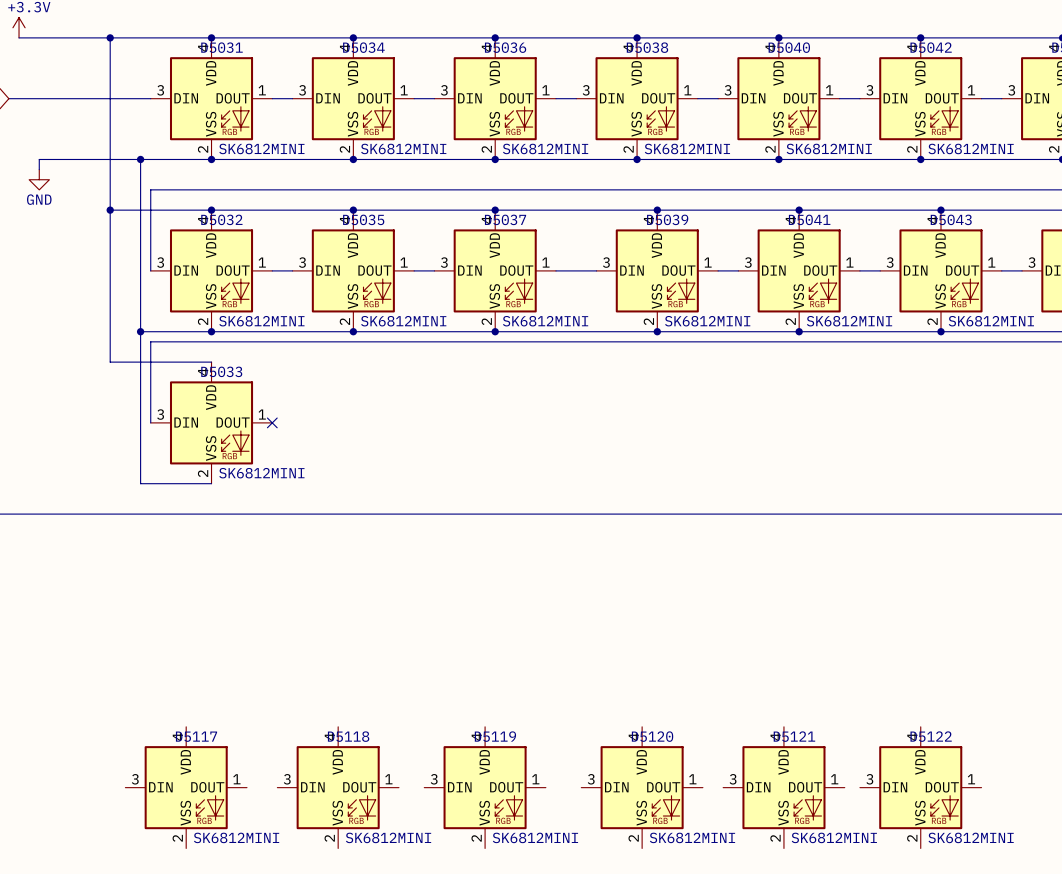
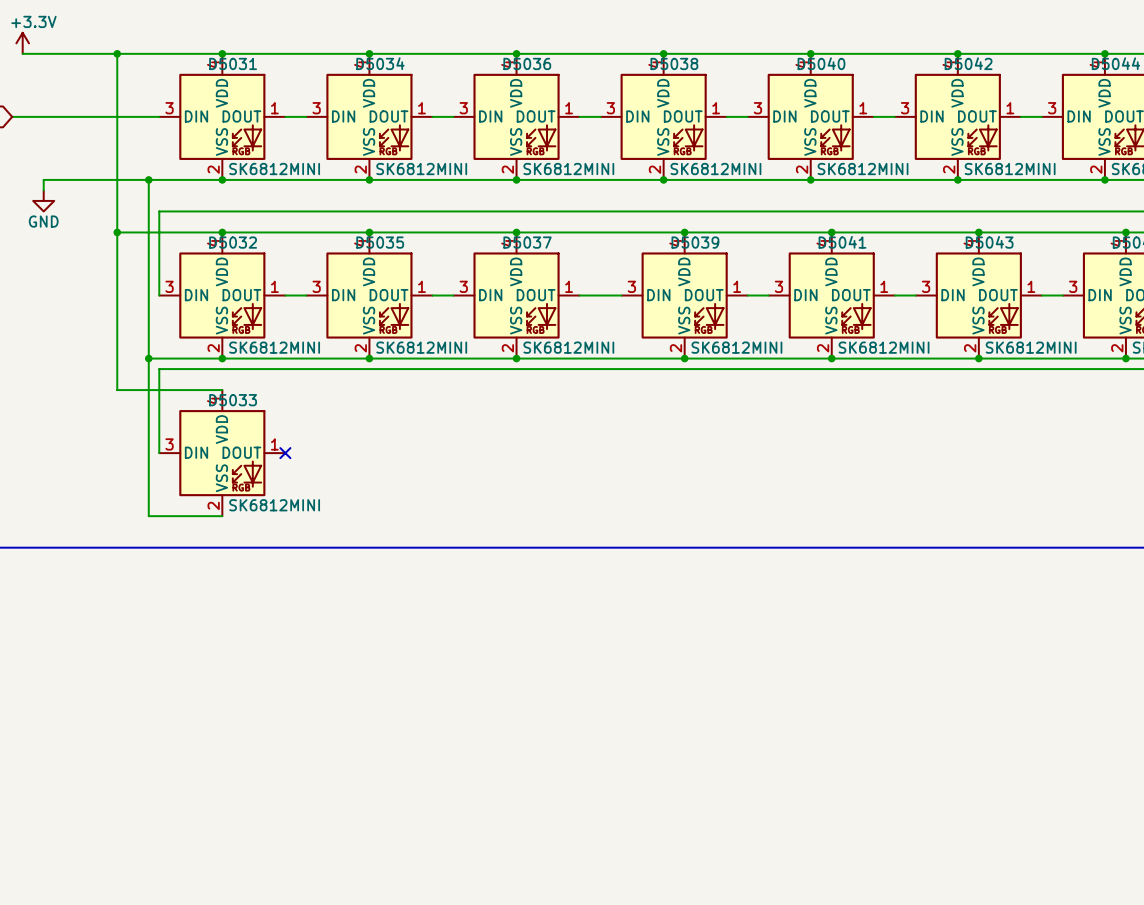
D5117: SK6812MINI (186, 787) -> none
D5118: SK6812MINI (338, 787) -> none
D5119: SK6812MINI (485, 787) -> none
D5120: SK6812MINI (642, 787) -> none
D5121: SK6812MINI (783, 787) -> none
D5122: SK6812MINI (920, 787) -> none

